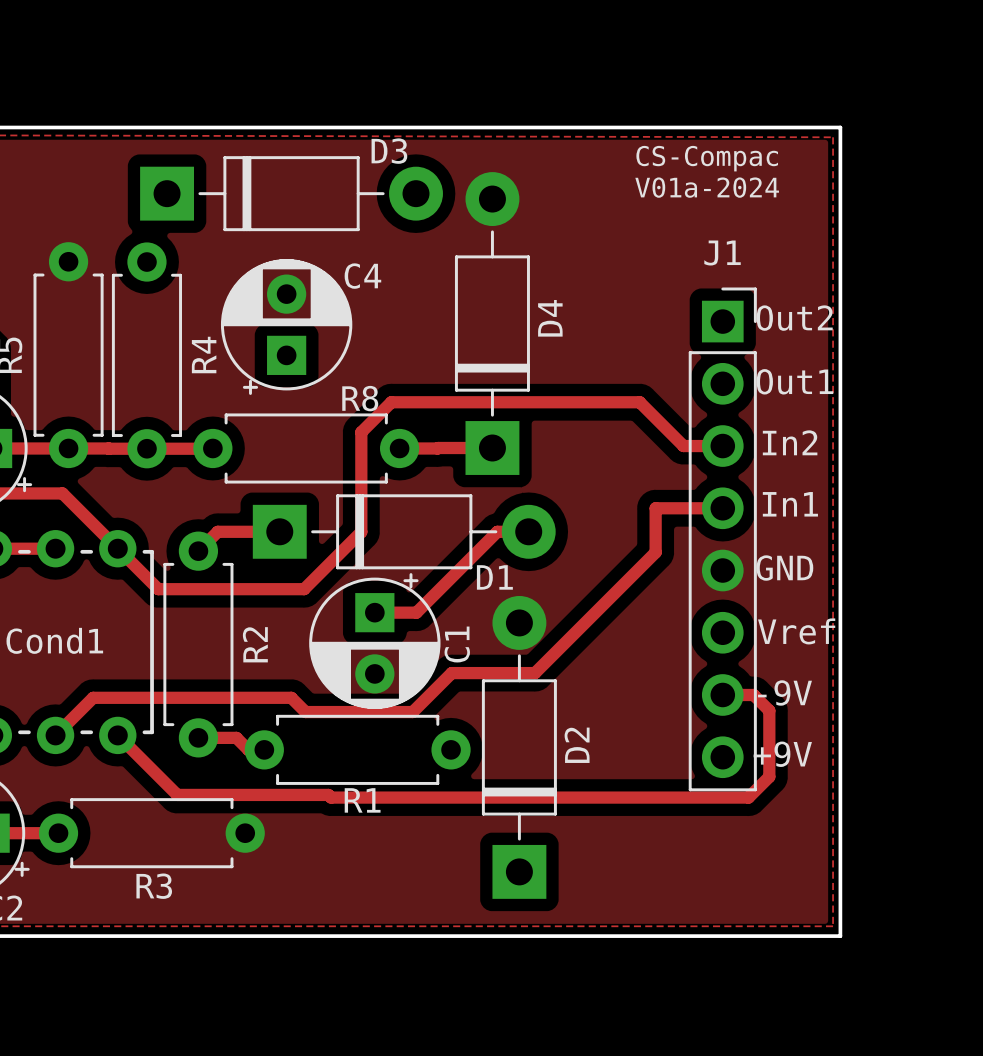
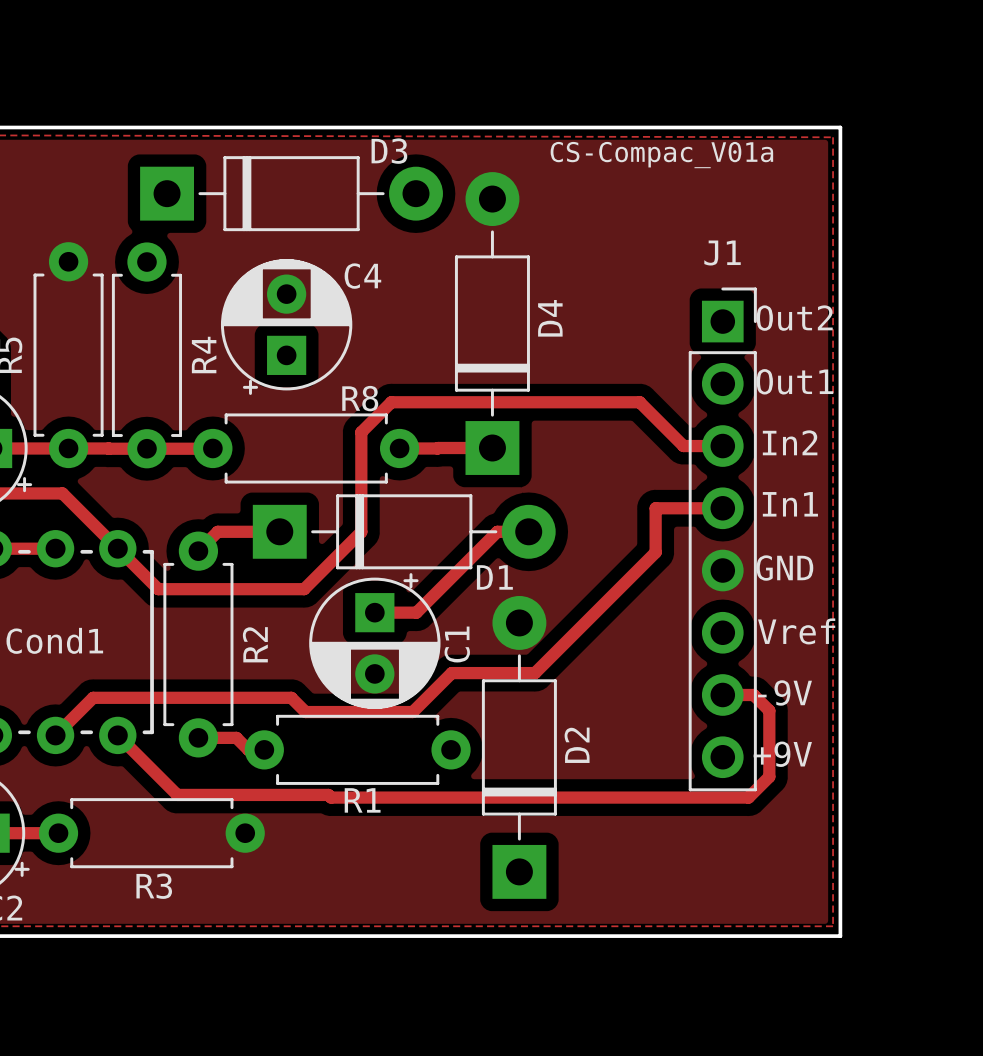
text: CS-Compac (707, 158) -> CS-Compac_V01a (661, 155)
text: V01a-2024 (707, 187) -> none

